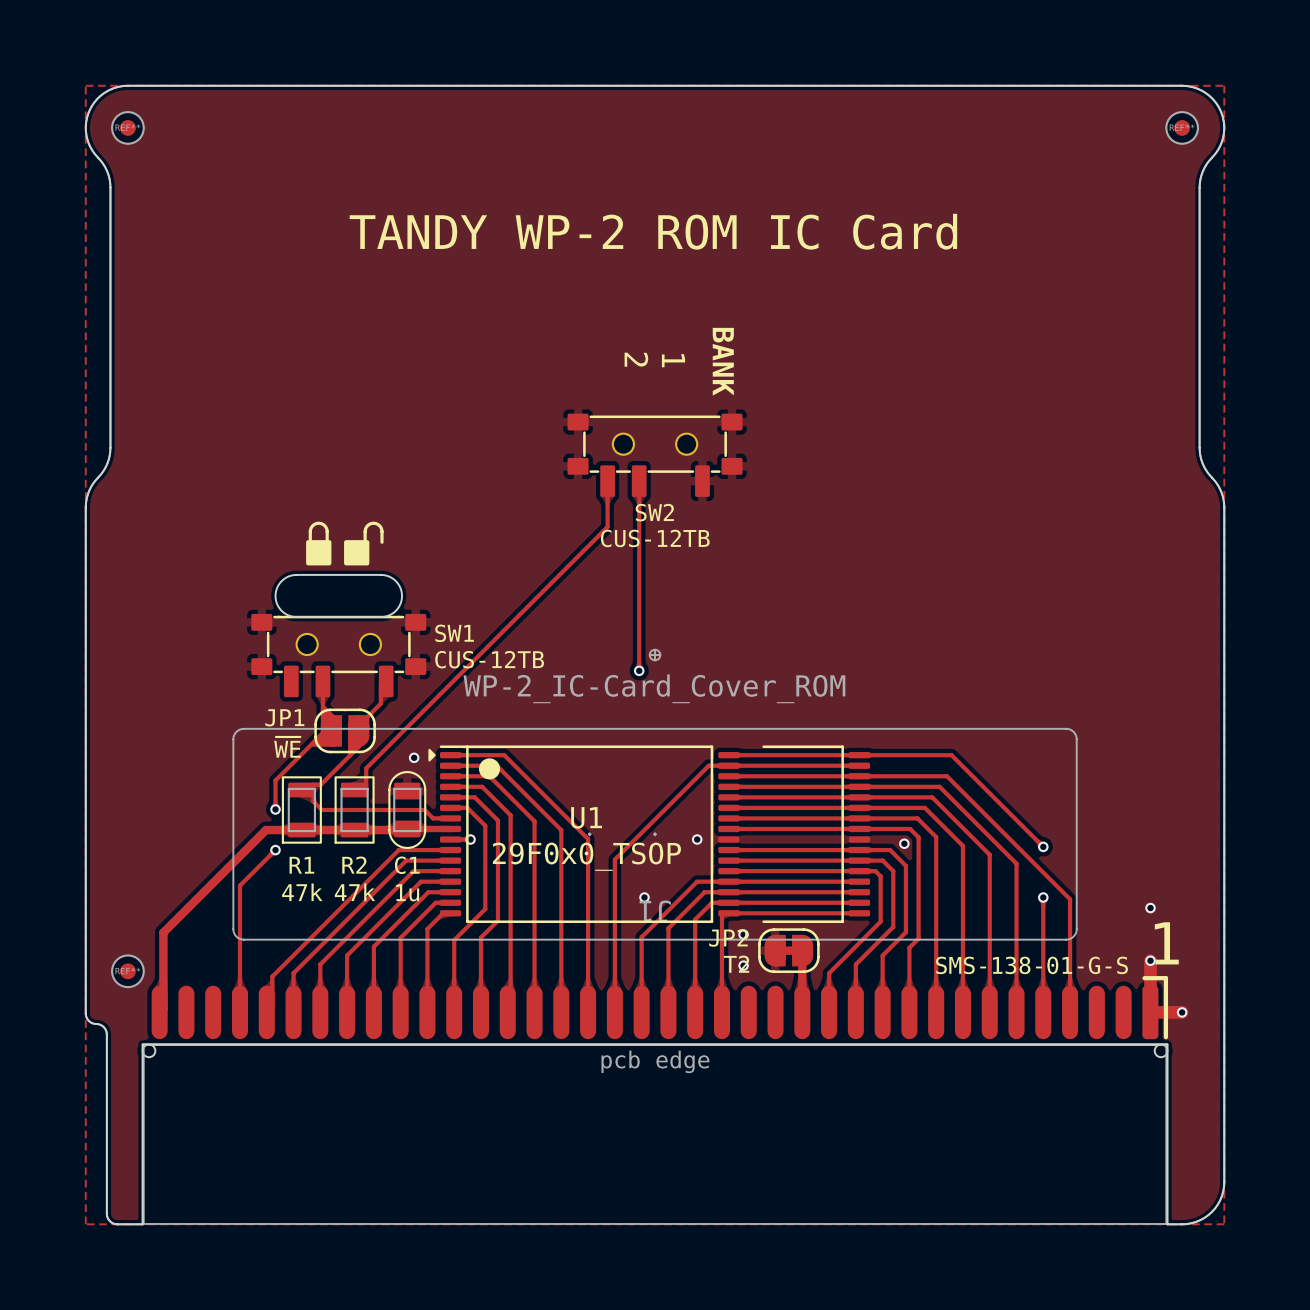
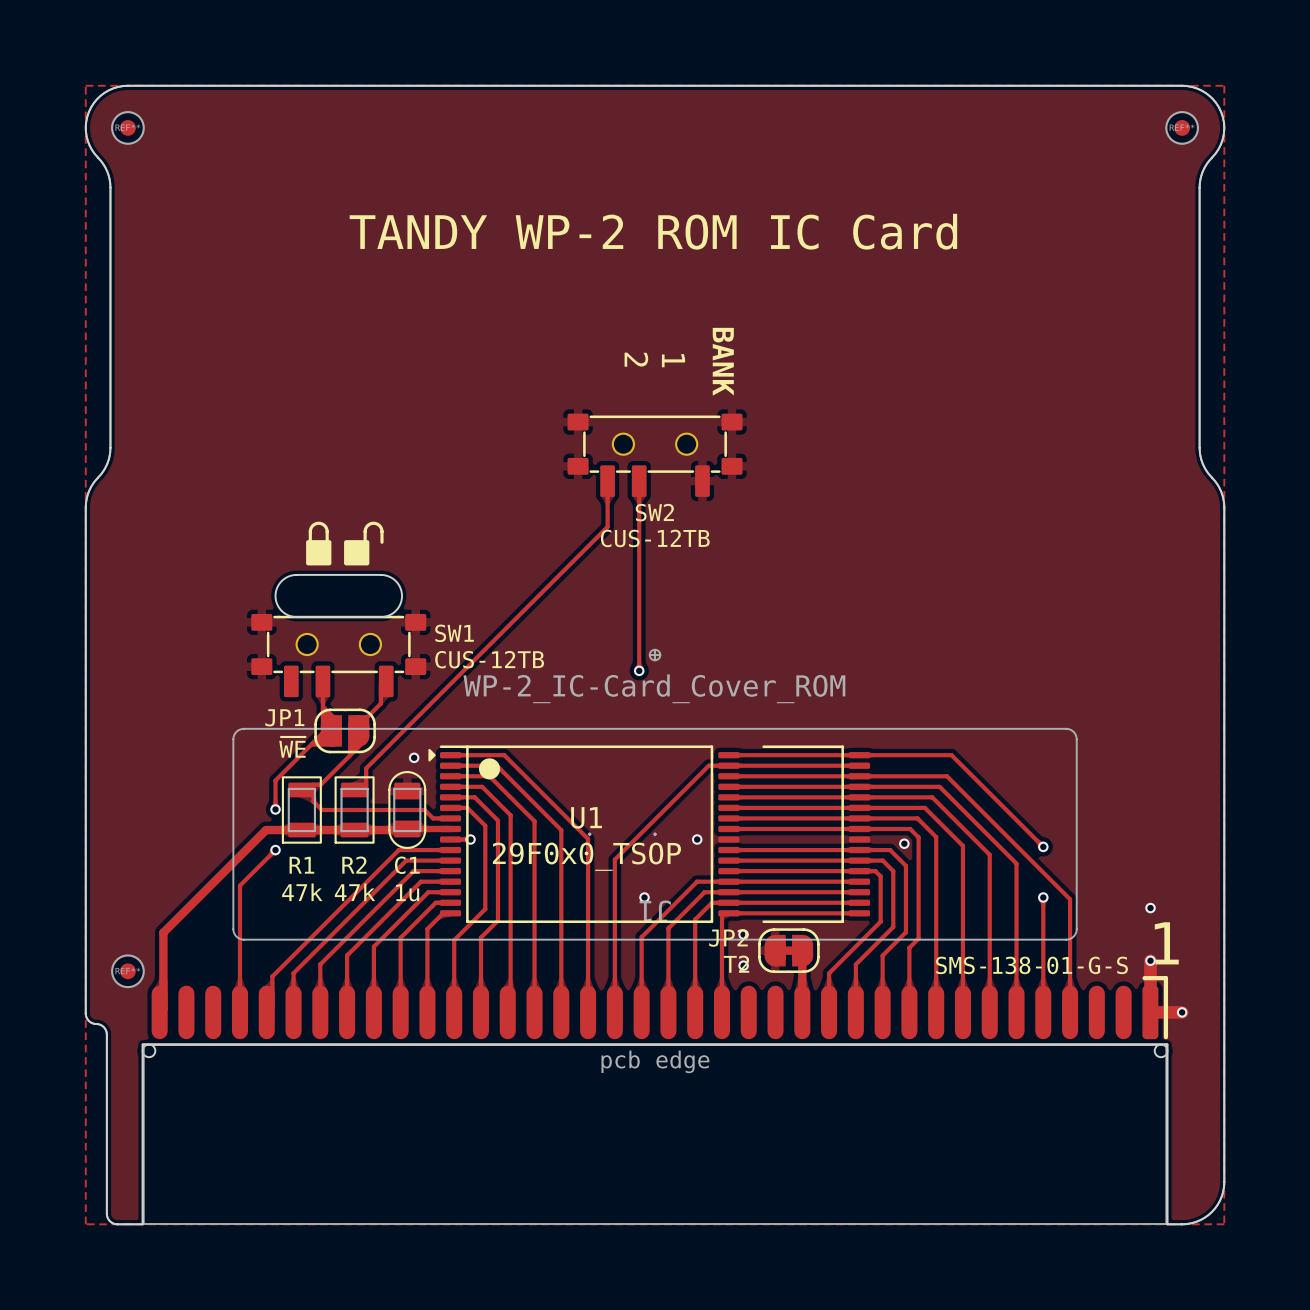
JP1 value position: ~{WE} (287, 747) -> ~{WE} (292, 747)

